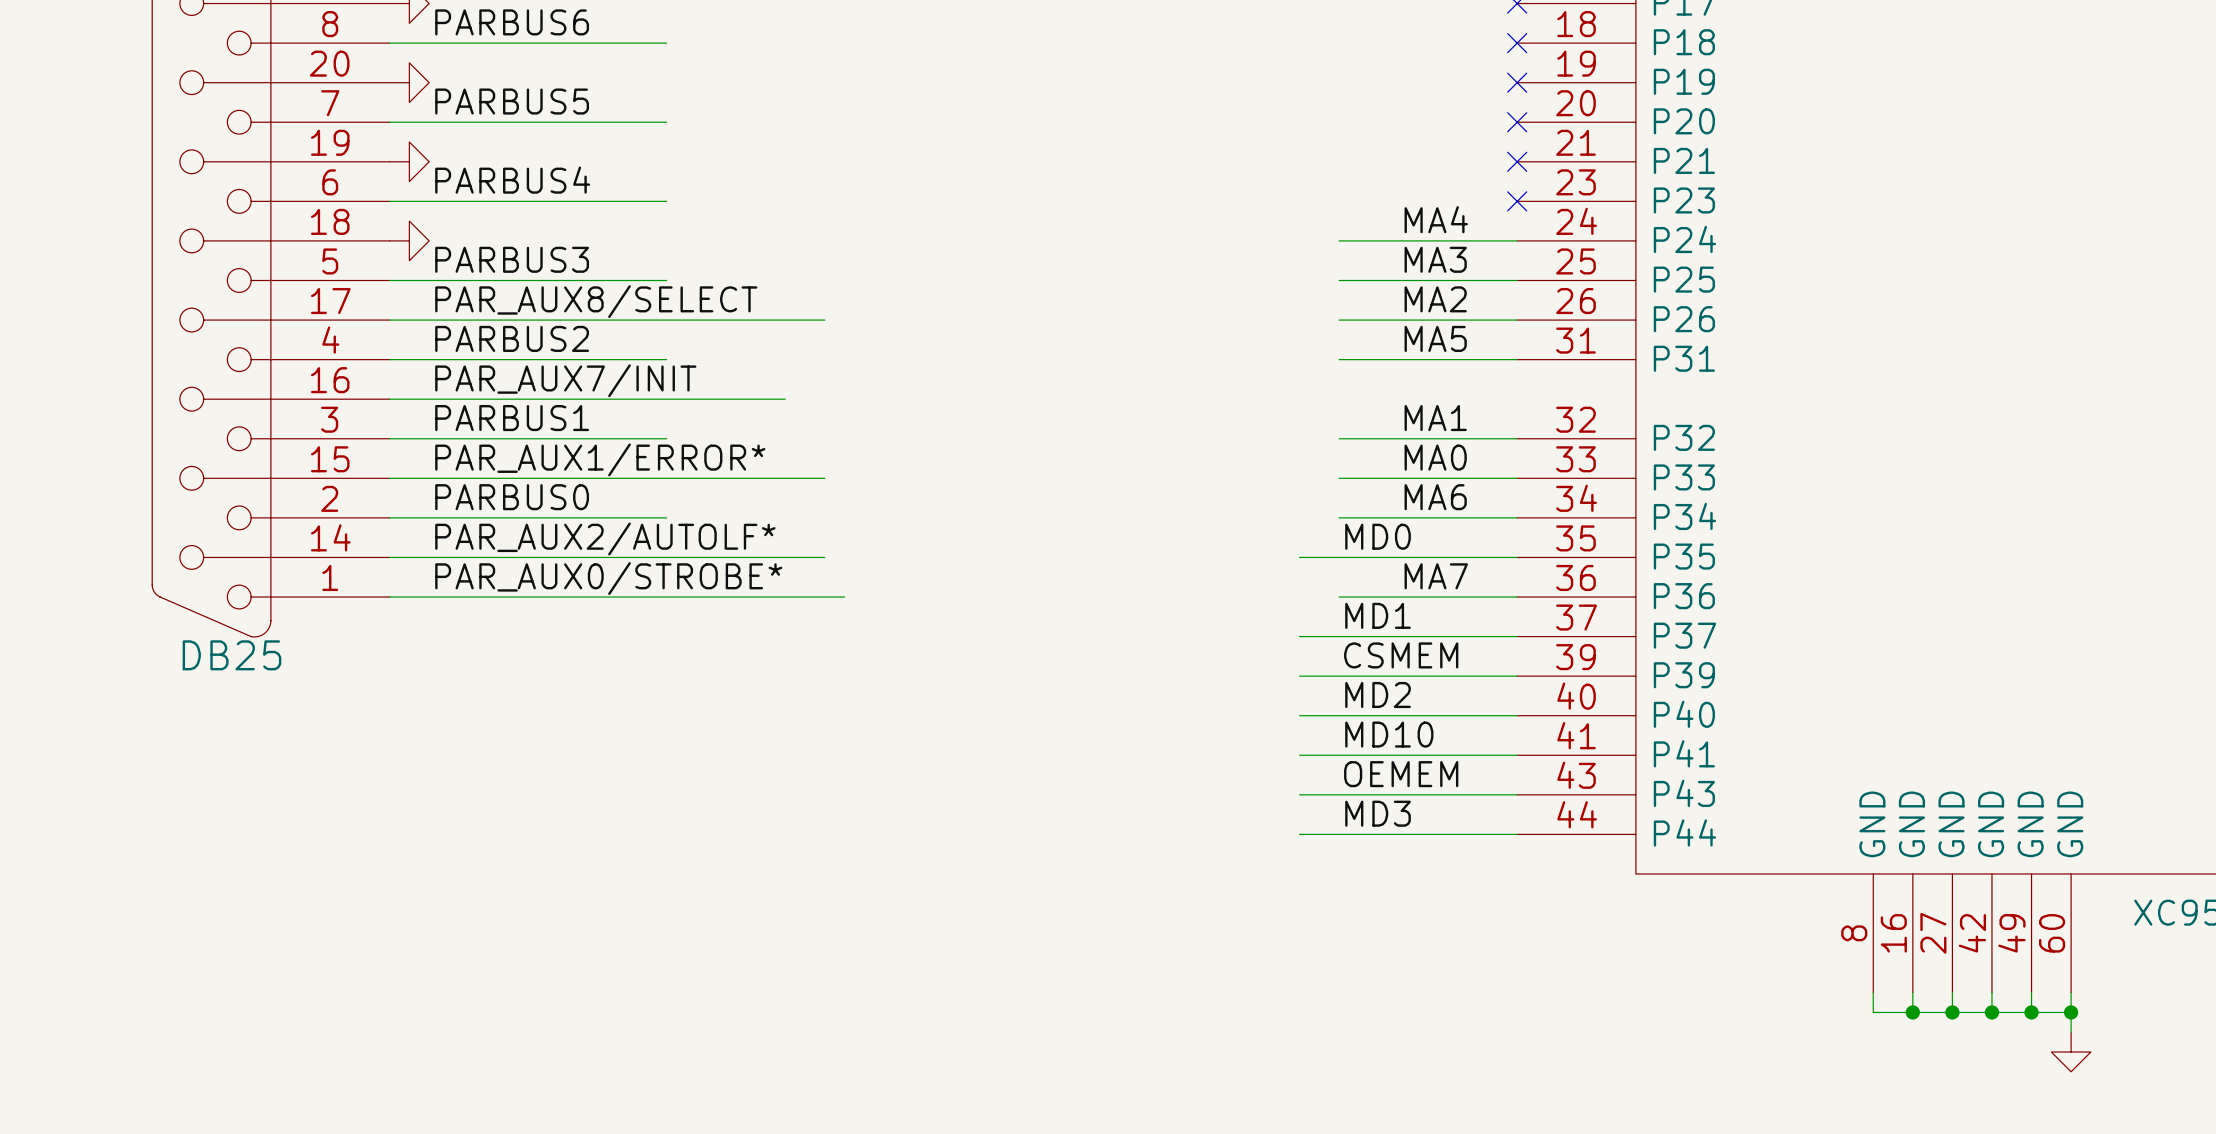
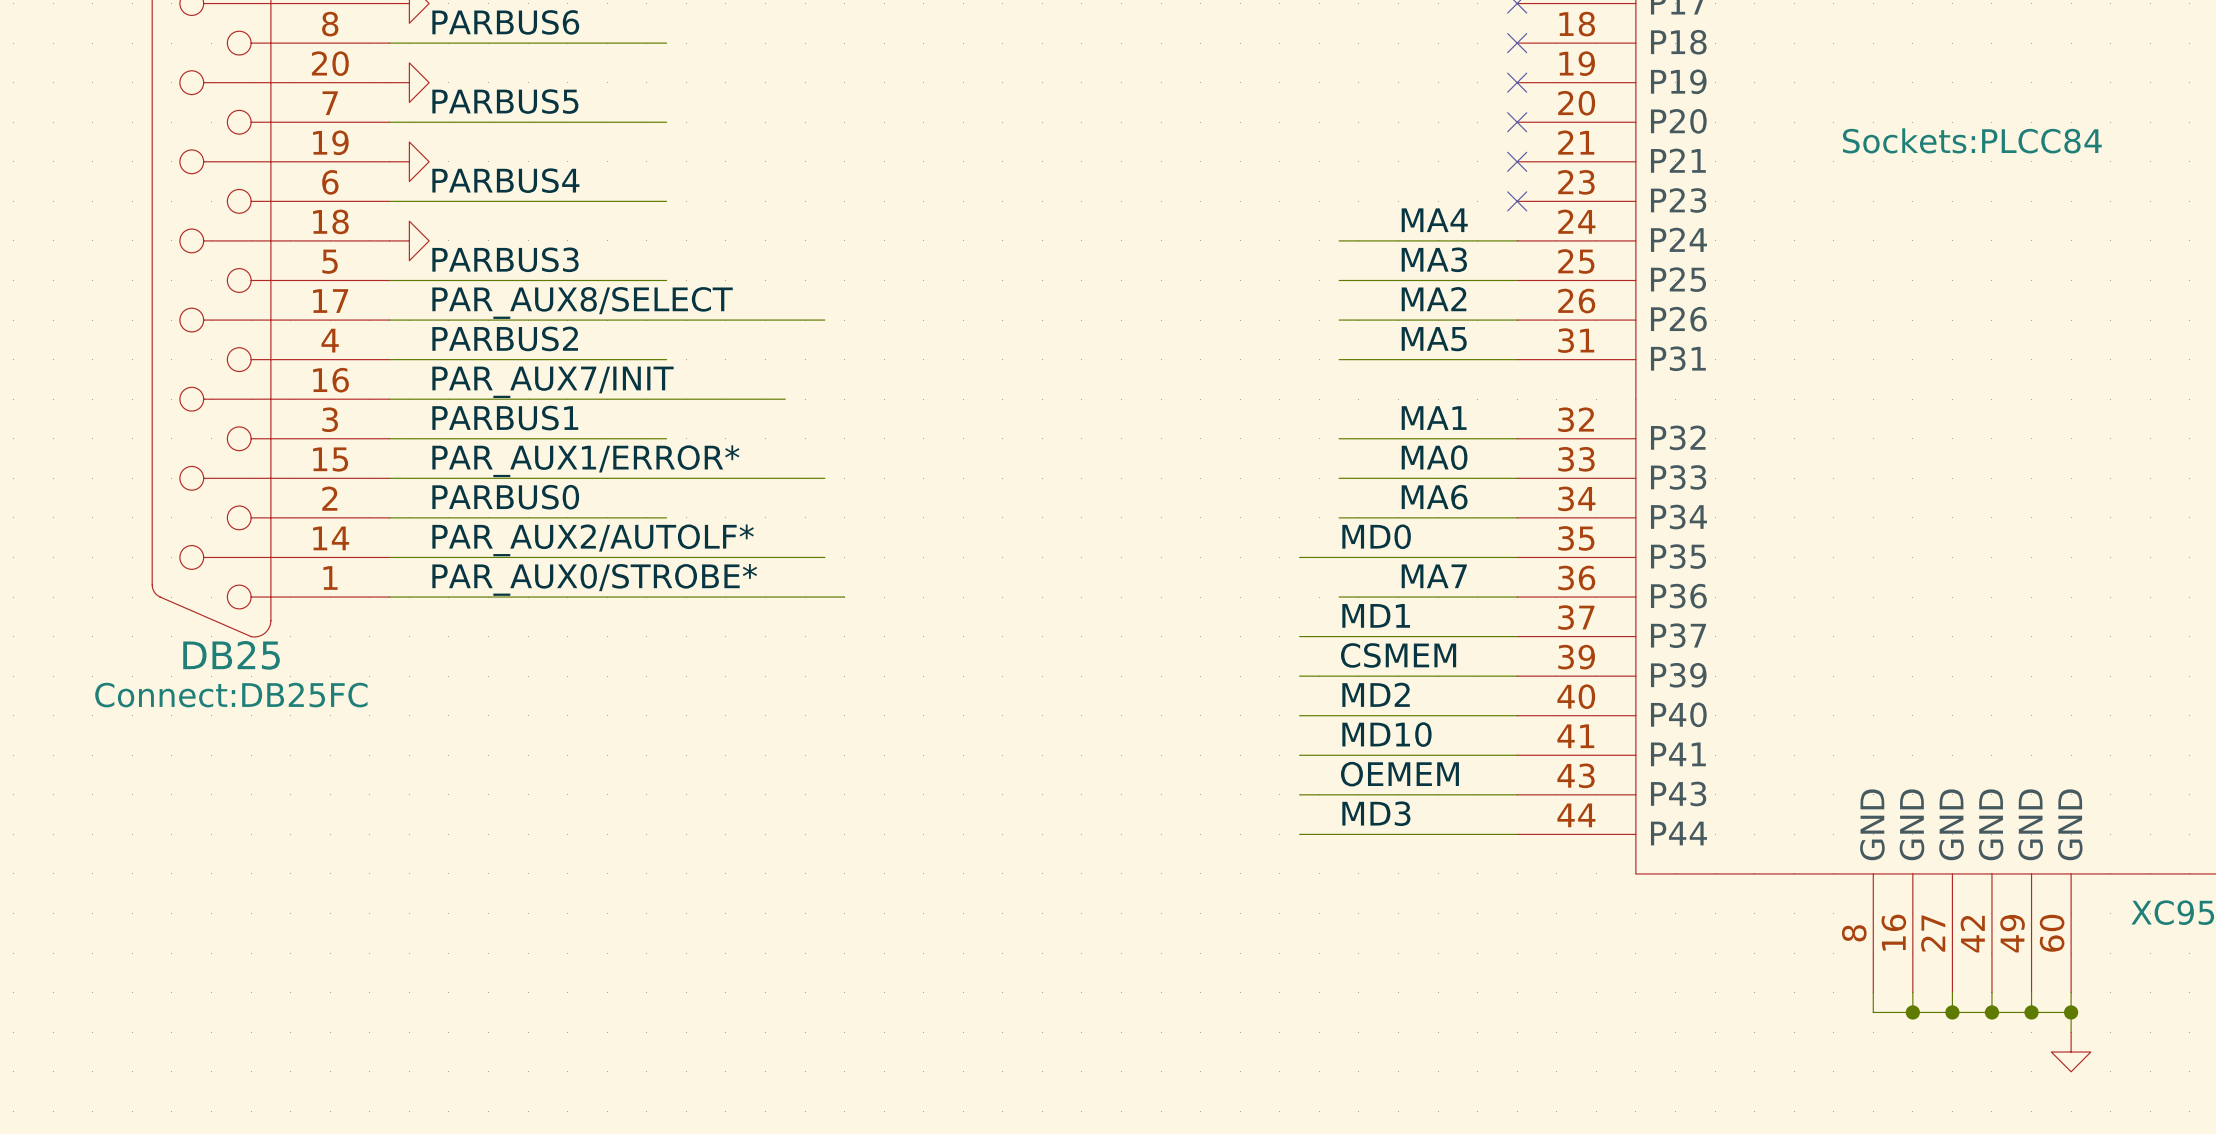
part text: none -> Sockets:PLCC84 (1972, 140)
part text: none -> Connect:DB25FC (231, 695)

